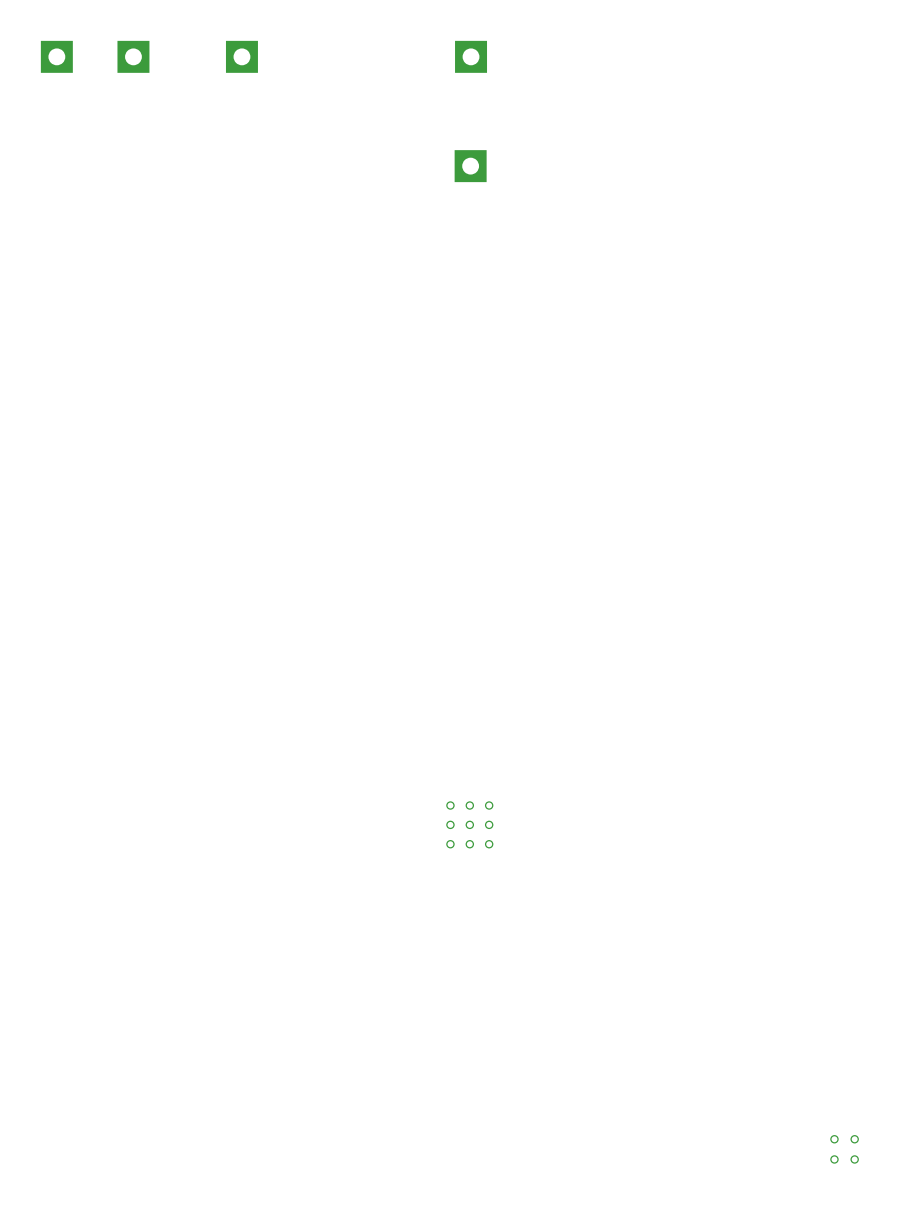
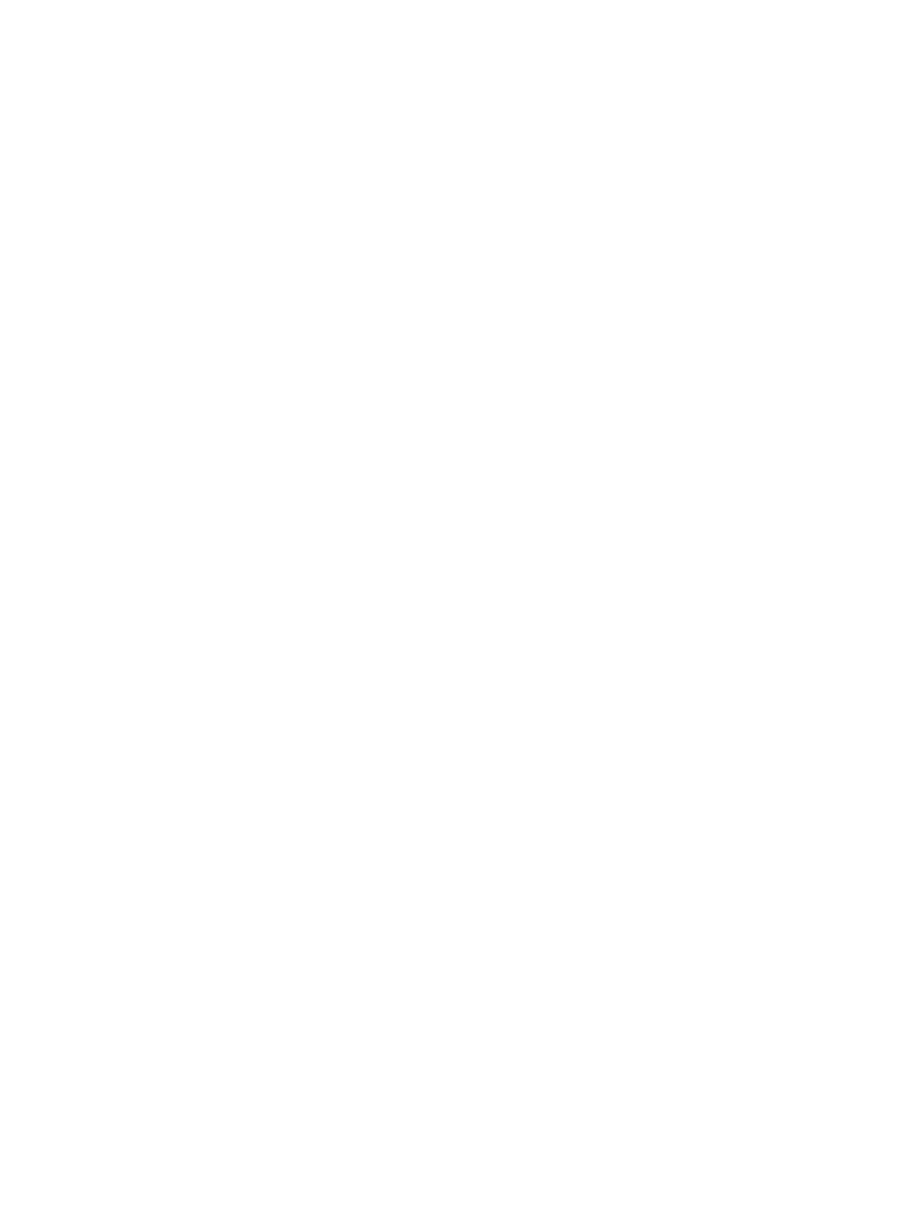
part: (56, 56) -> none
part: (133, 56) -> none
part: (241, 56) -> none
part: (471, 56) -> none
part: (470, 166) -> none
part: (469, 824) -> none
part: (844, 1149) -> none

